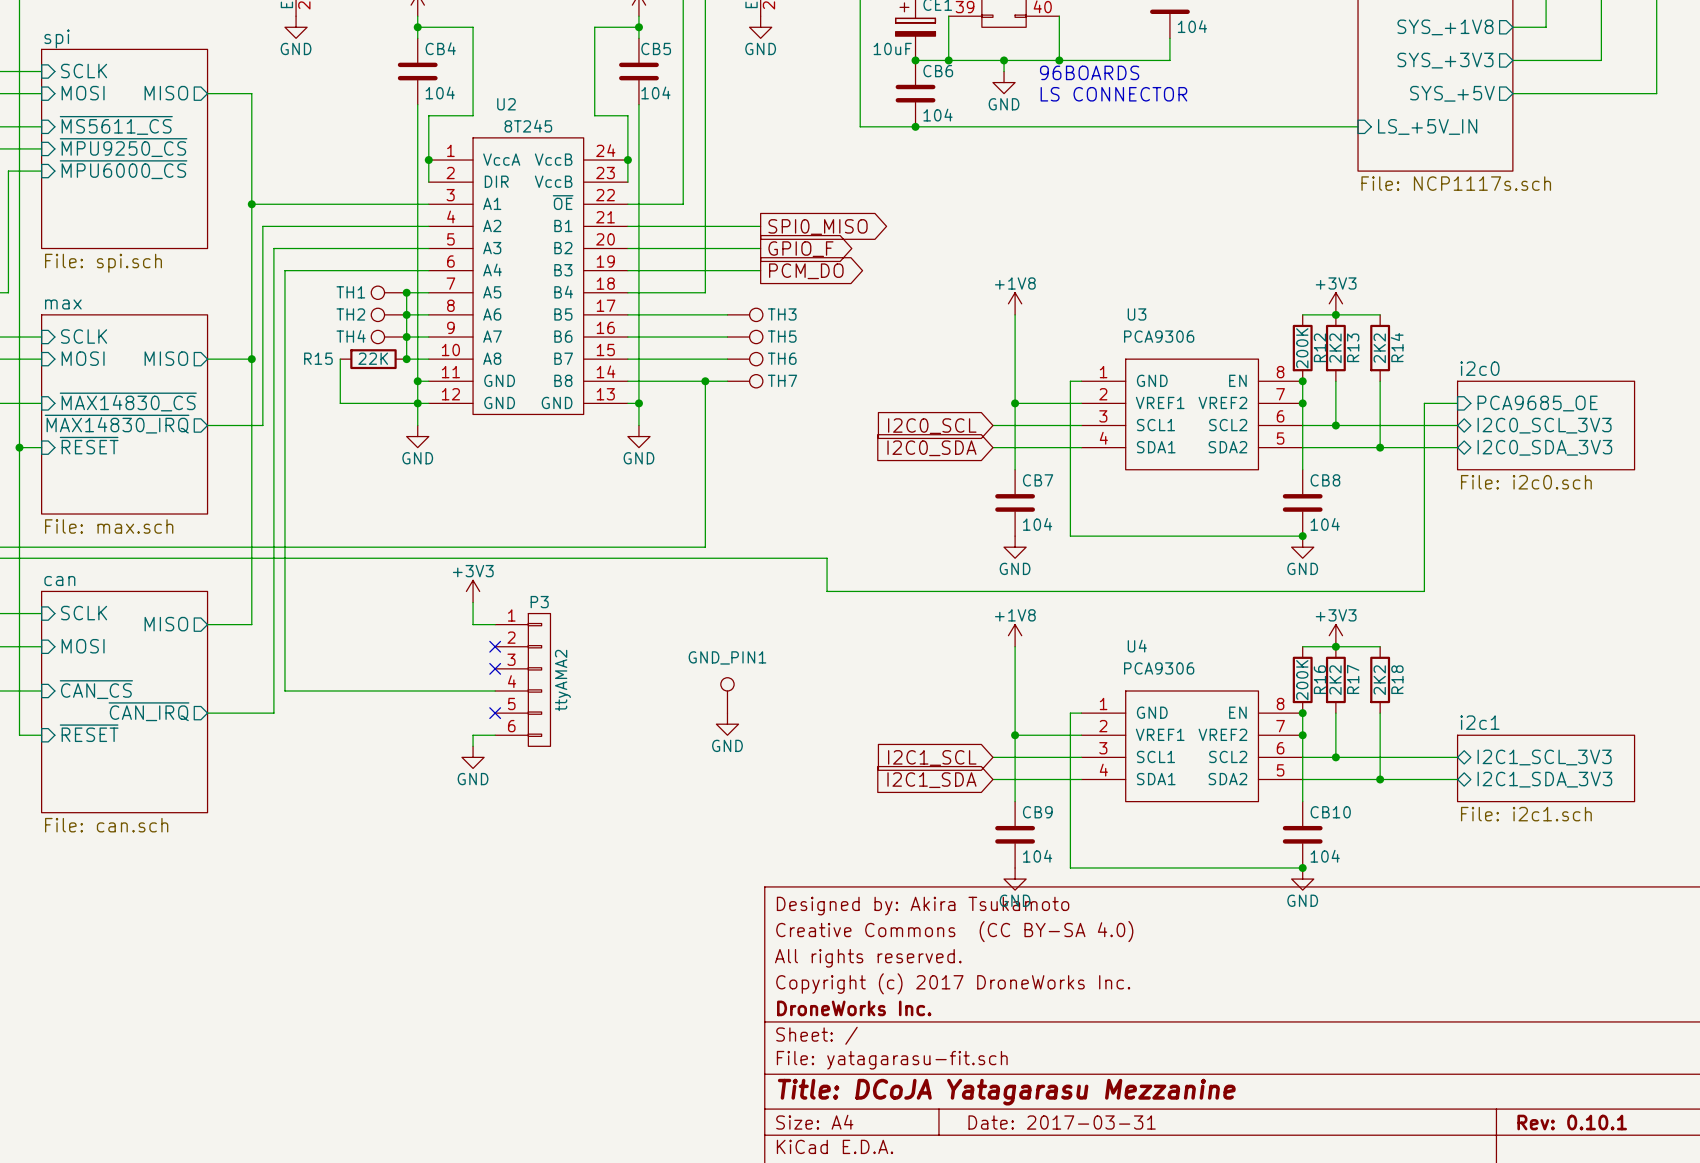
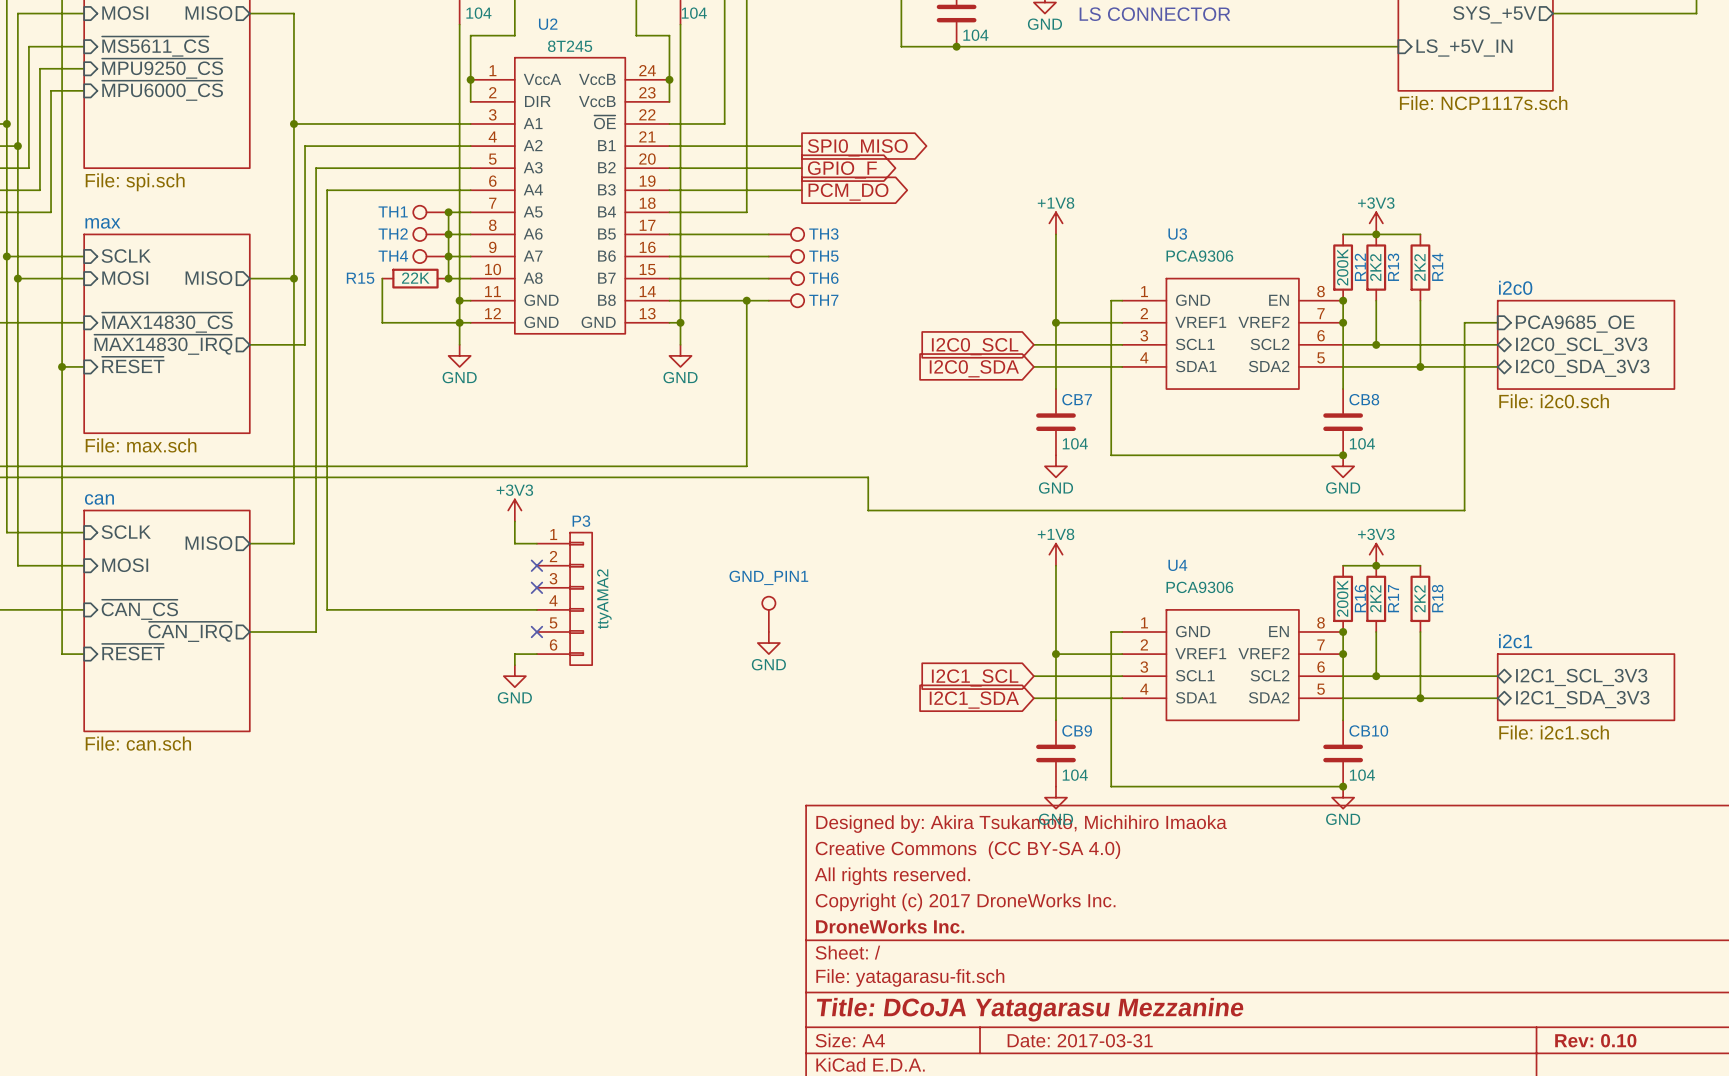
title block: Designed by: Akira Tsukamoto (923, 906) -> Designed by: Akira Tsukamoto, Michihiro Imaoka (1021, 824)
title block: Rev: 0.10.1 (1572, 1122) -> Rev: 0.10 (1595, 1040)

